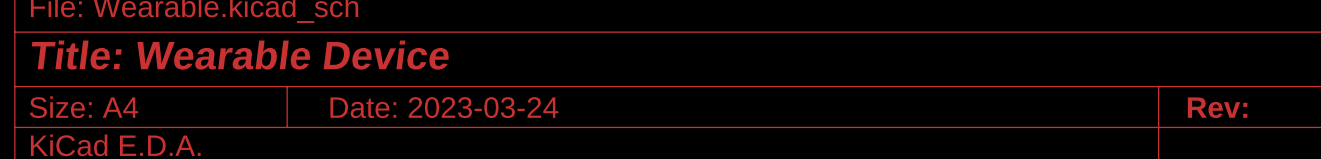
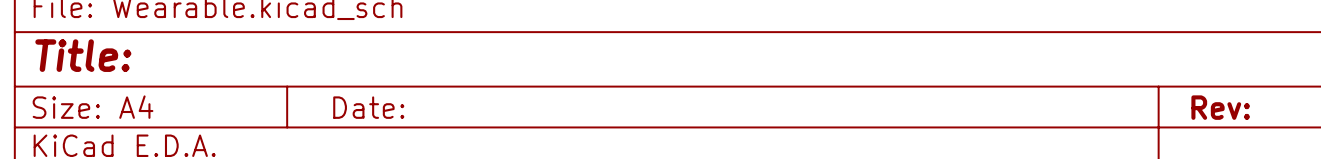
title block: Title: Wearable Device (240, 55) -> Title: (83, 55)
title block: Date: 2023-03-24 (444, 107) -> Date: (368, 107)

